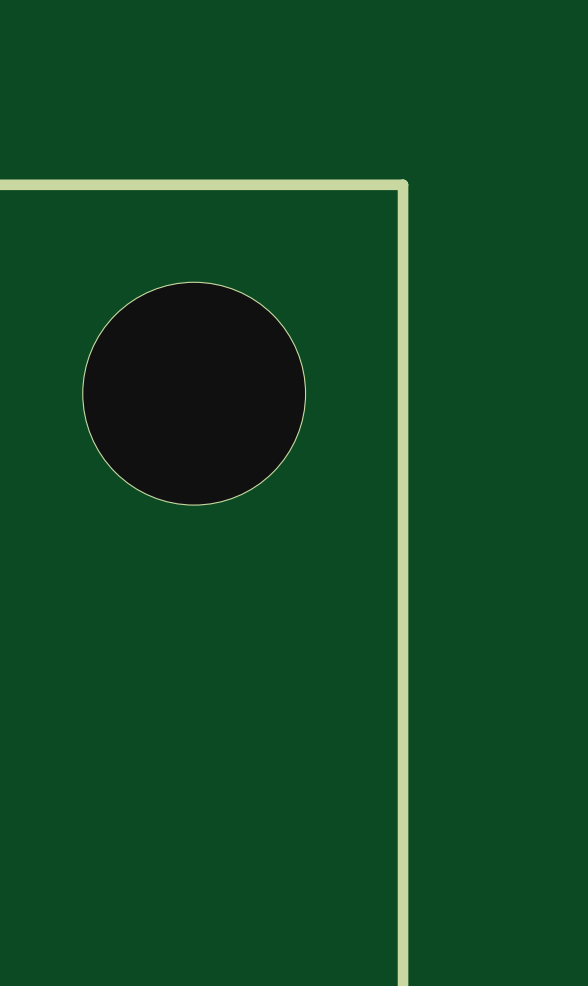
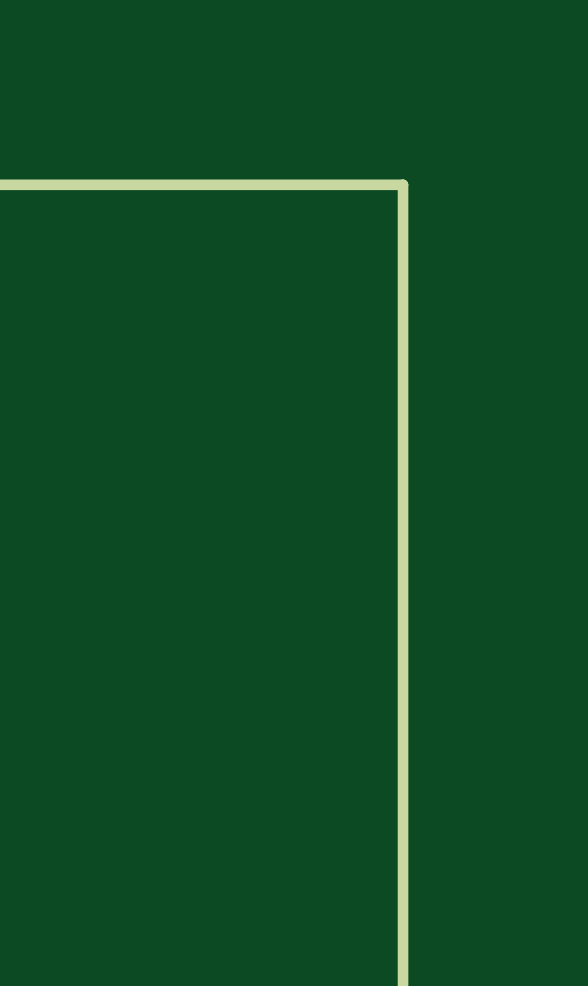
hole: (194, 393) -> none

